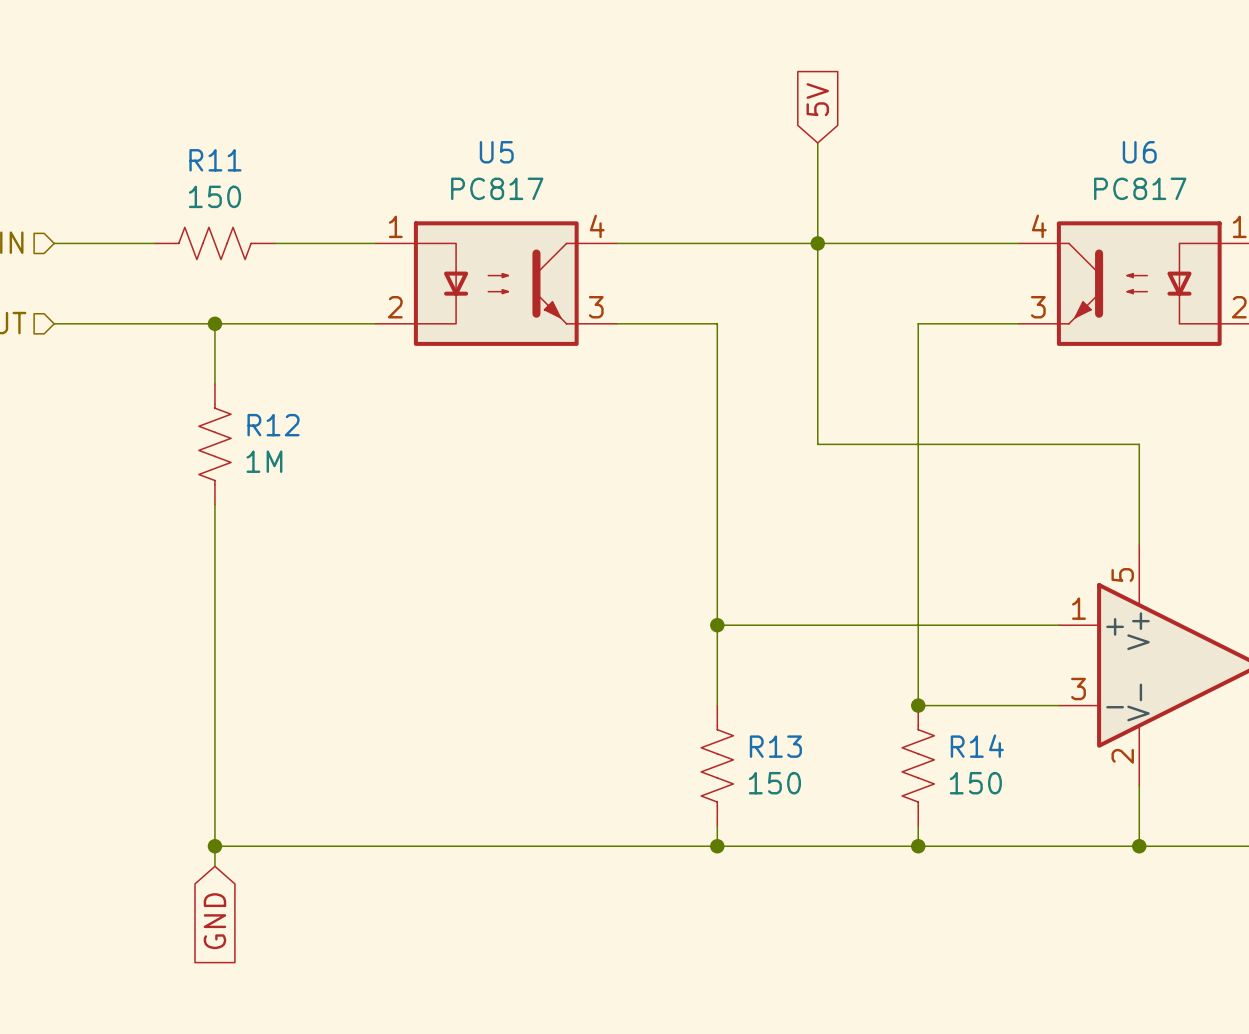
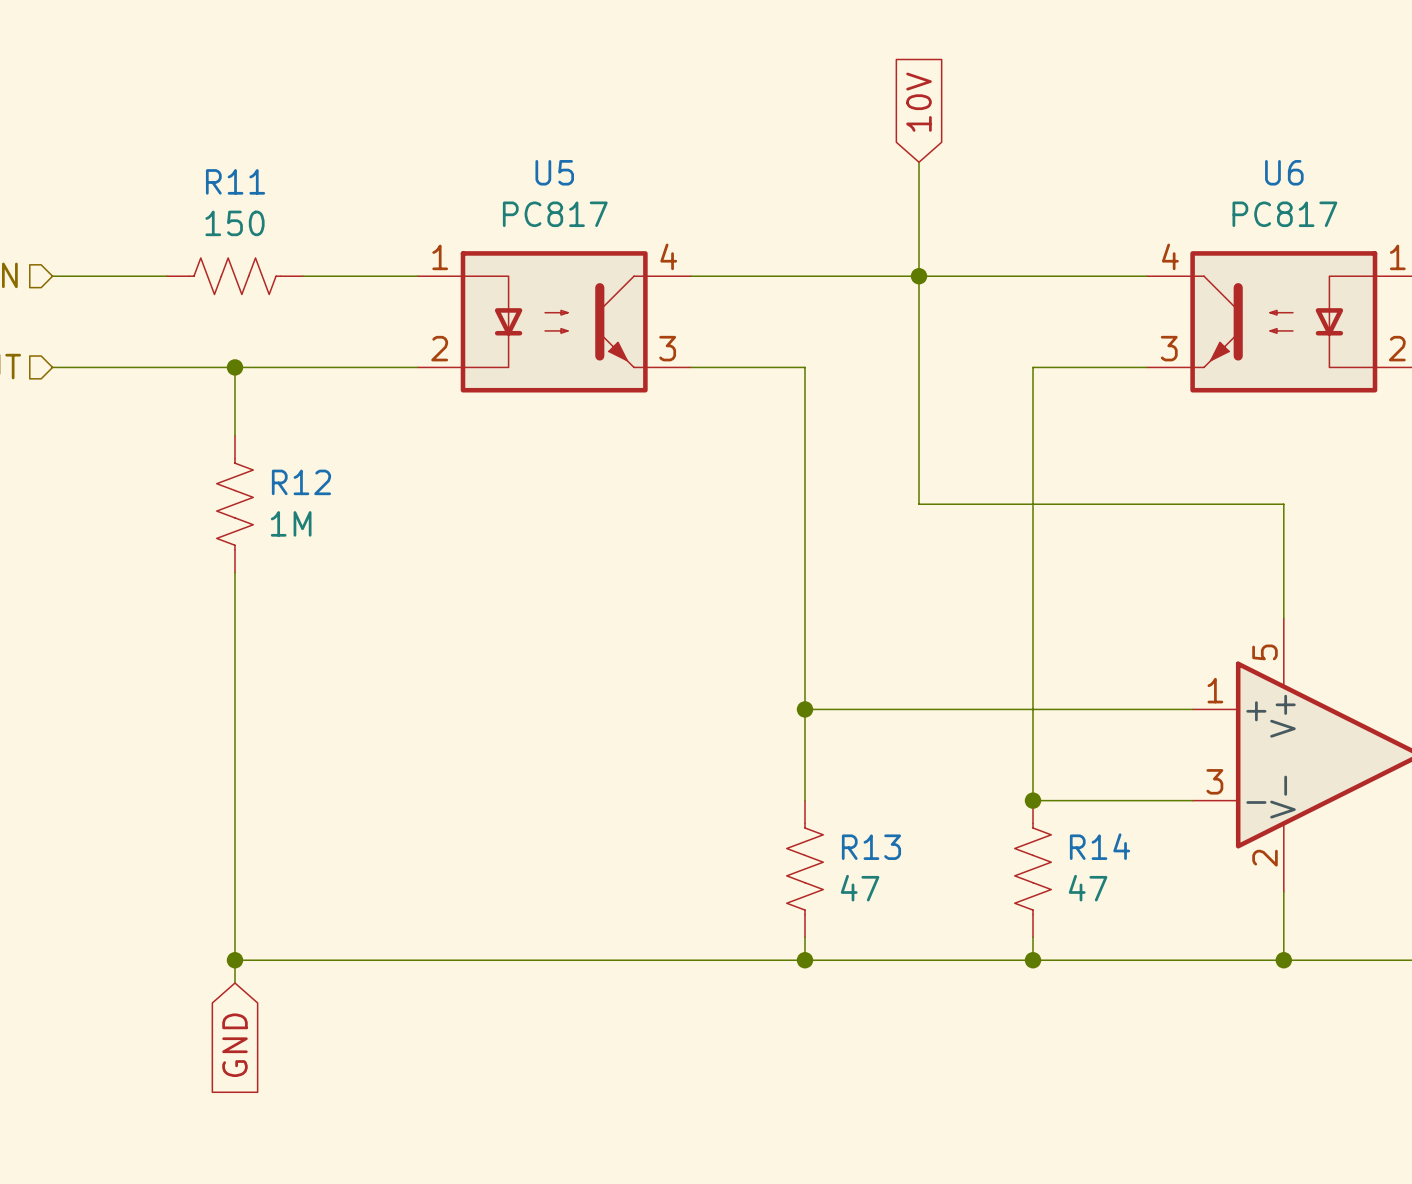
global label: 5V (817, 99) -> 10V (919, 102)
R13 value: 150 (774, 783) -> 47 (860, 888)
R14 value: 150 (975, 783) -> 47 (1088, 888)

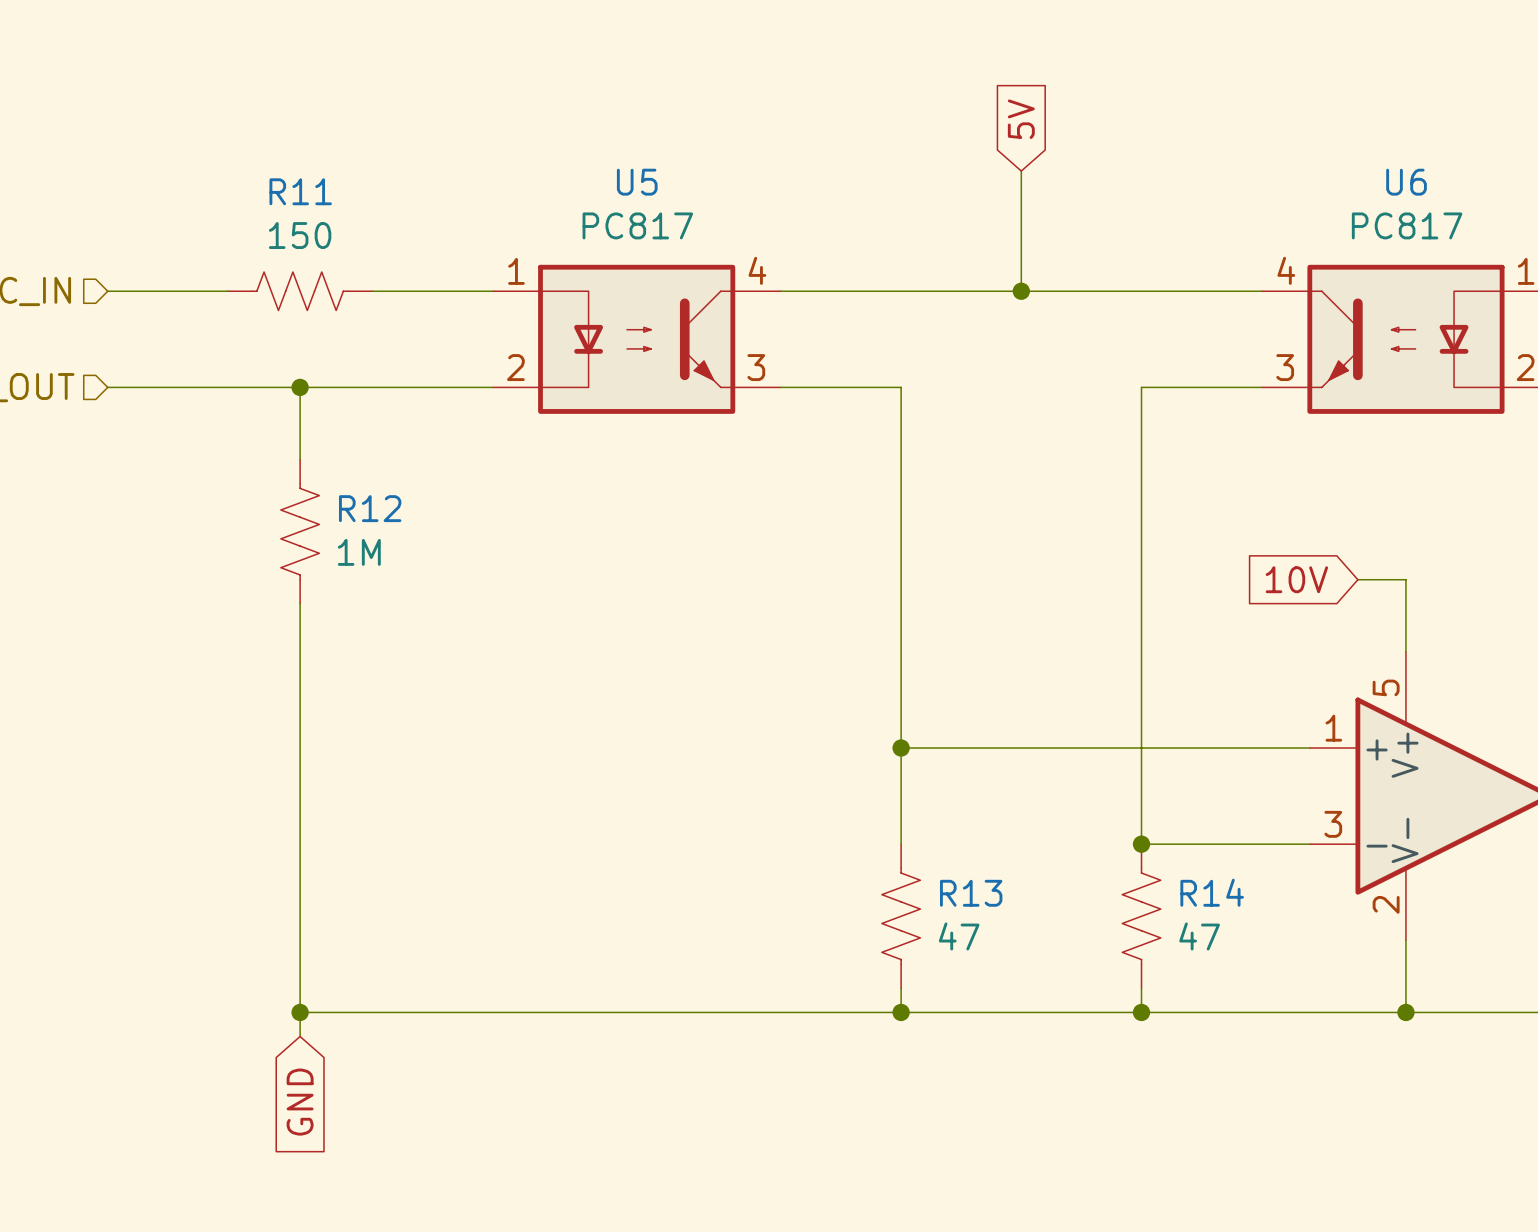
global label: 10V (919, 102) -> 5V (1021, 119)
wire: (919, 276) (919, 504) (1283, 504) (1283, 549) -> (1357, 579) (1405, 579)
global label: none -> 10V (1296, 579)

